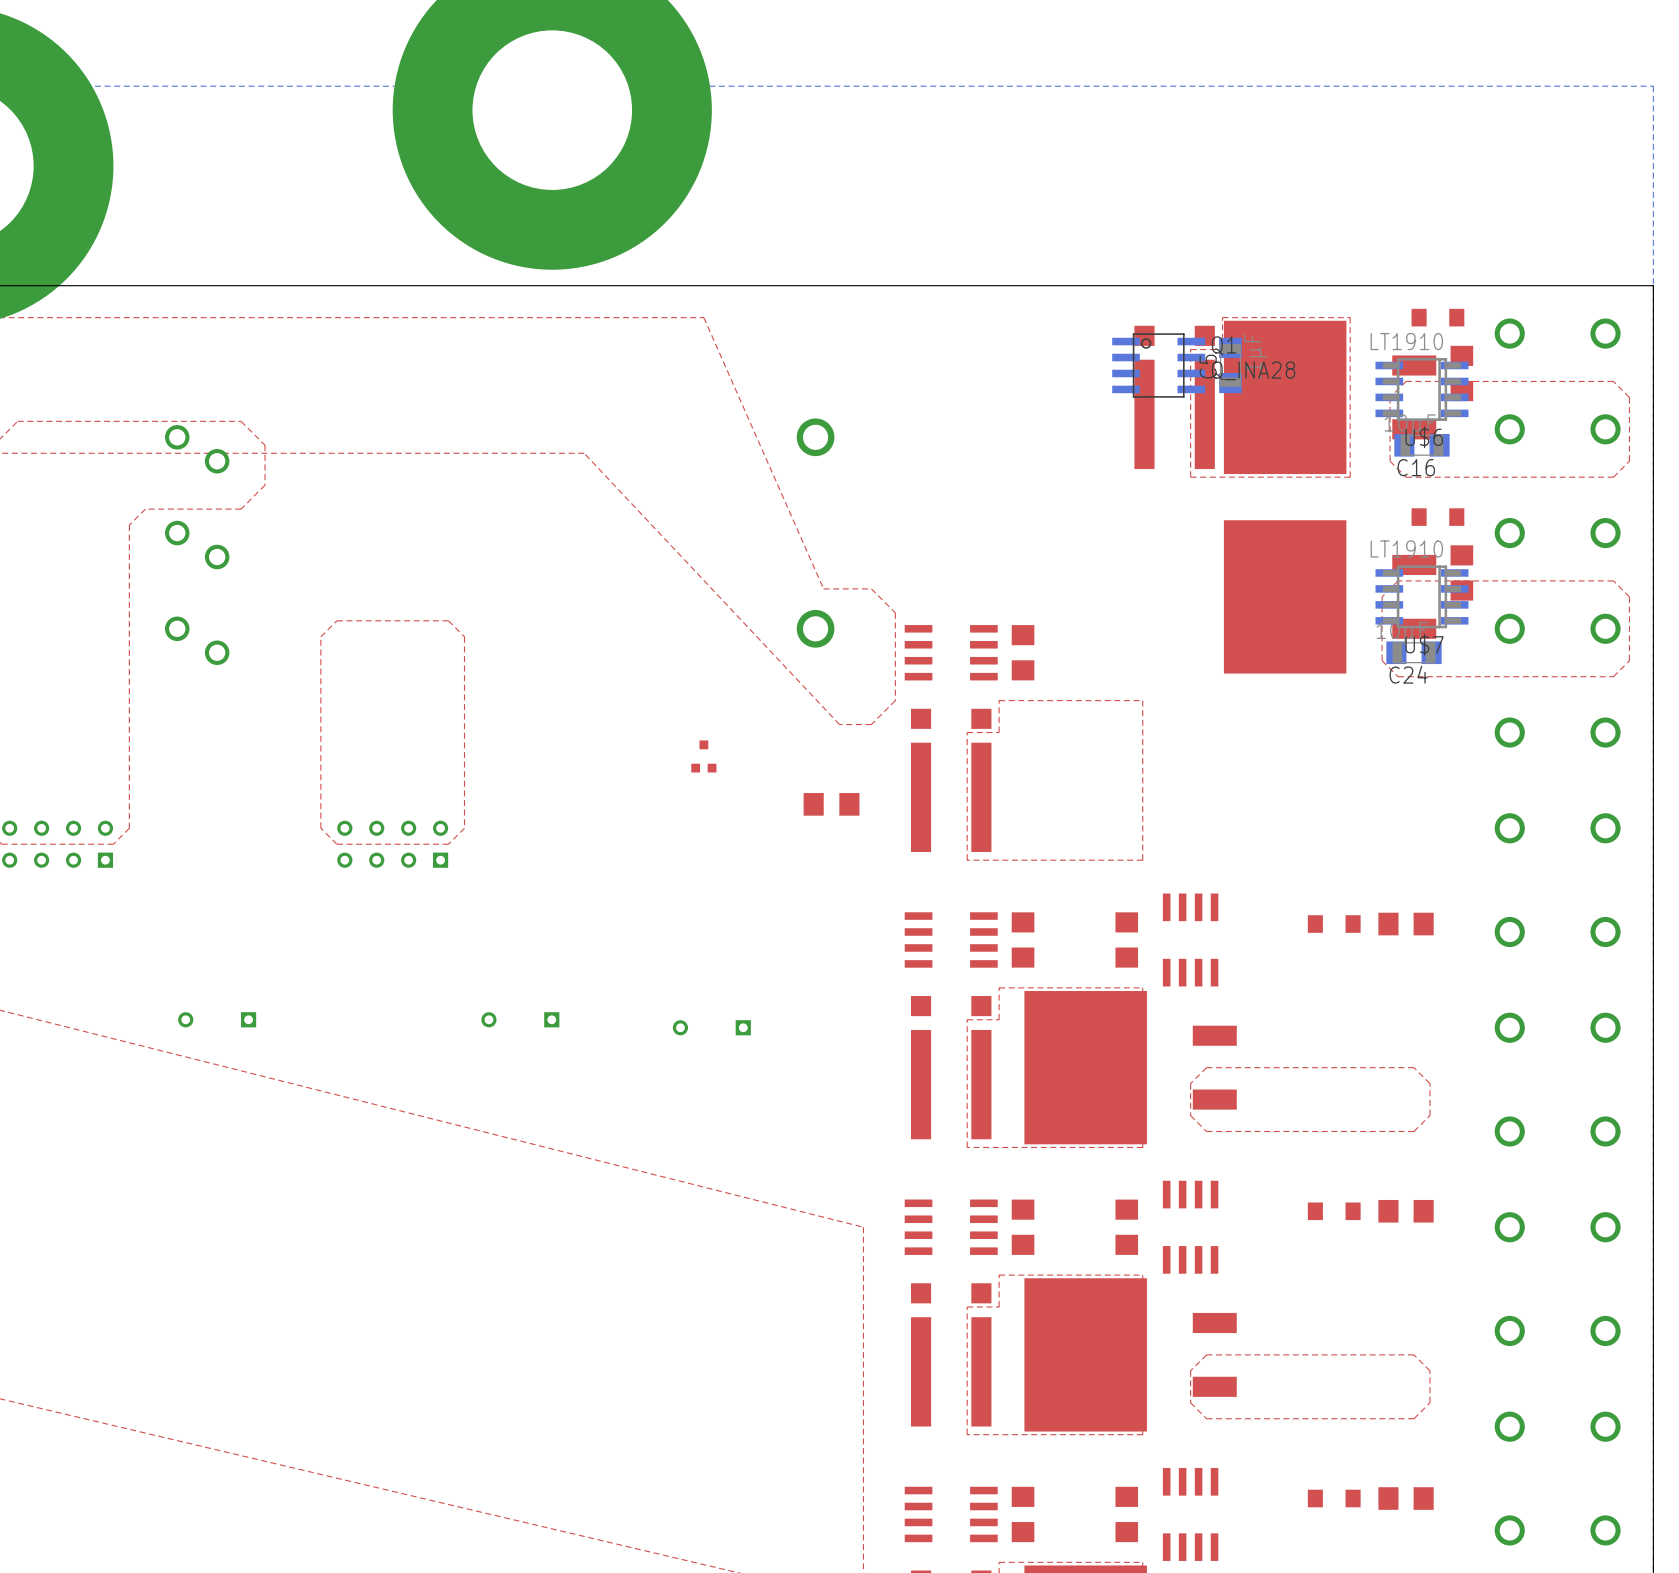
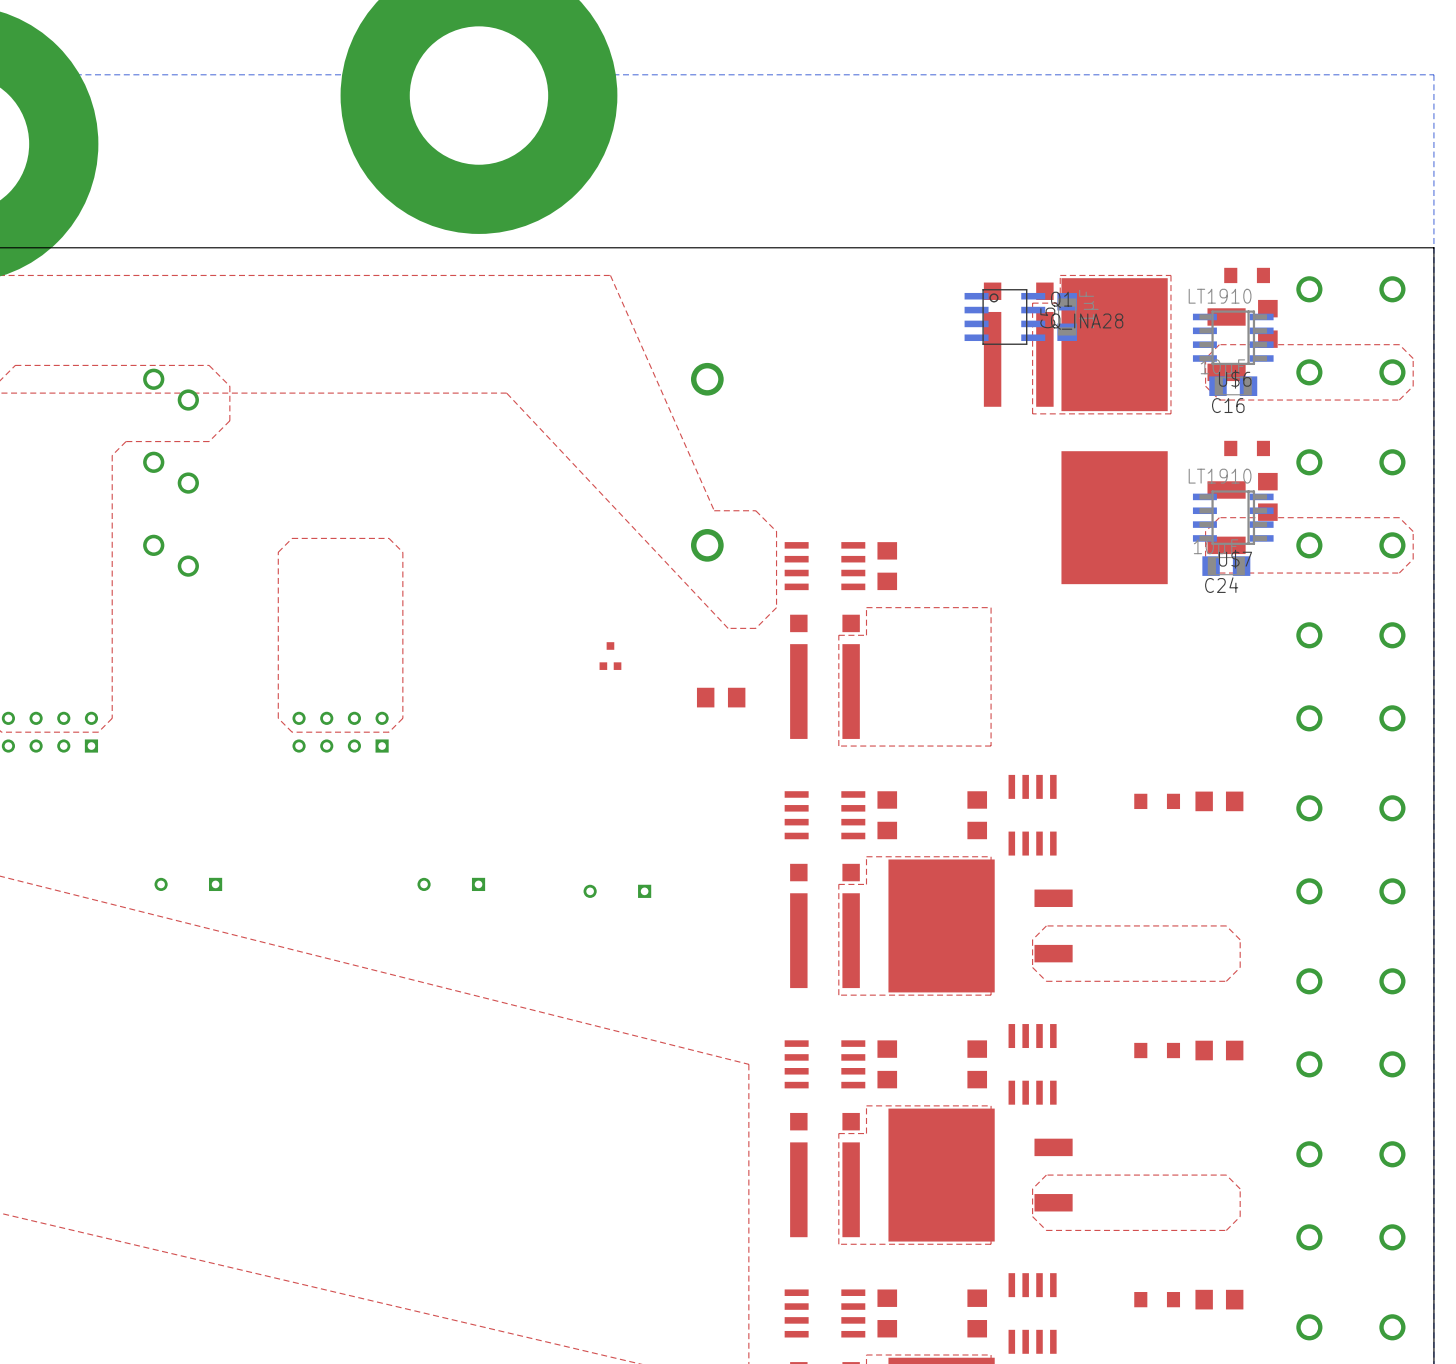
top zone outline: (1629, 413) (1629, 397) (1613, 381) (1406, 381) (1390, 397) (1390, 413) -> (1413, 358) (1399, 344) (1219, 344) (1205, 358)
top zone outline: (1629, 445) (1629, 461) (1613, 477) (1406, 477) (1390, 461) (1390, 445) -> (1413, 386) (1399, 400) (1219, 400) (1205, 386)
top zone outline: (1629, 612) (1629, 596) (1613, 580) (1398, 580) (1382, 596) (1382, 660) (1398, 676) (1613, 676) (1629, 660) (1629, 644) -> (1413, 531) (1399, 517) (1219, 517) (1205, 531) (1205, 559) (1219, 573) (1399, 573) (1413, 559)

